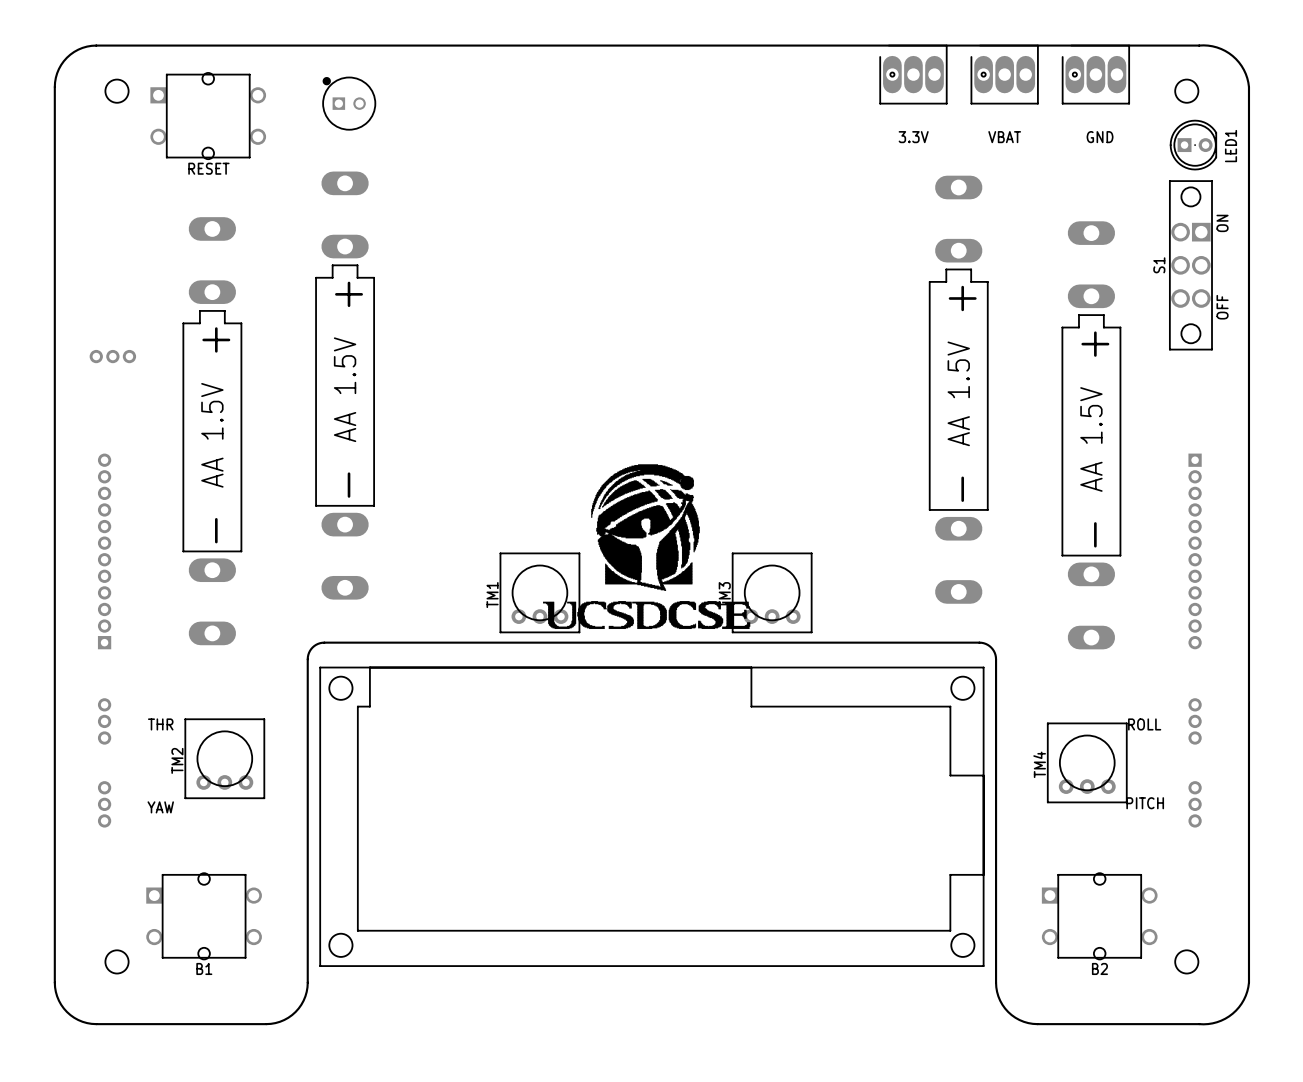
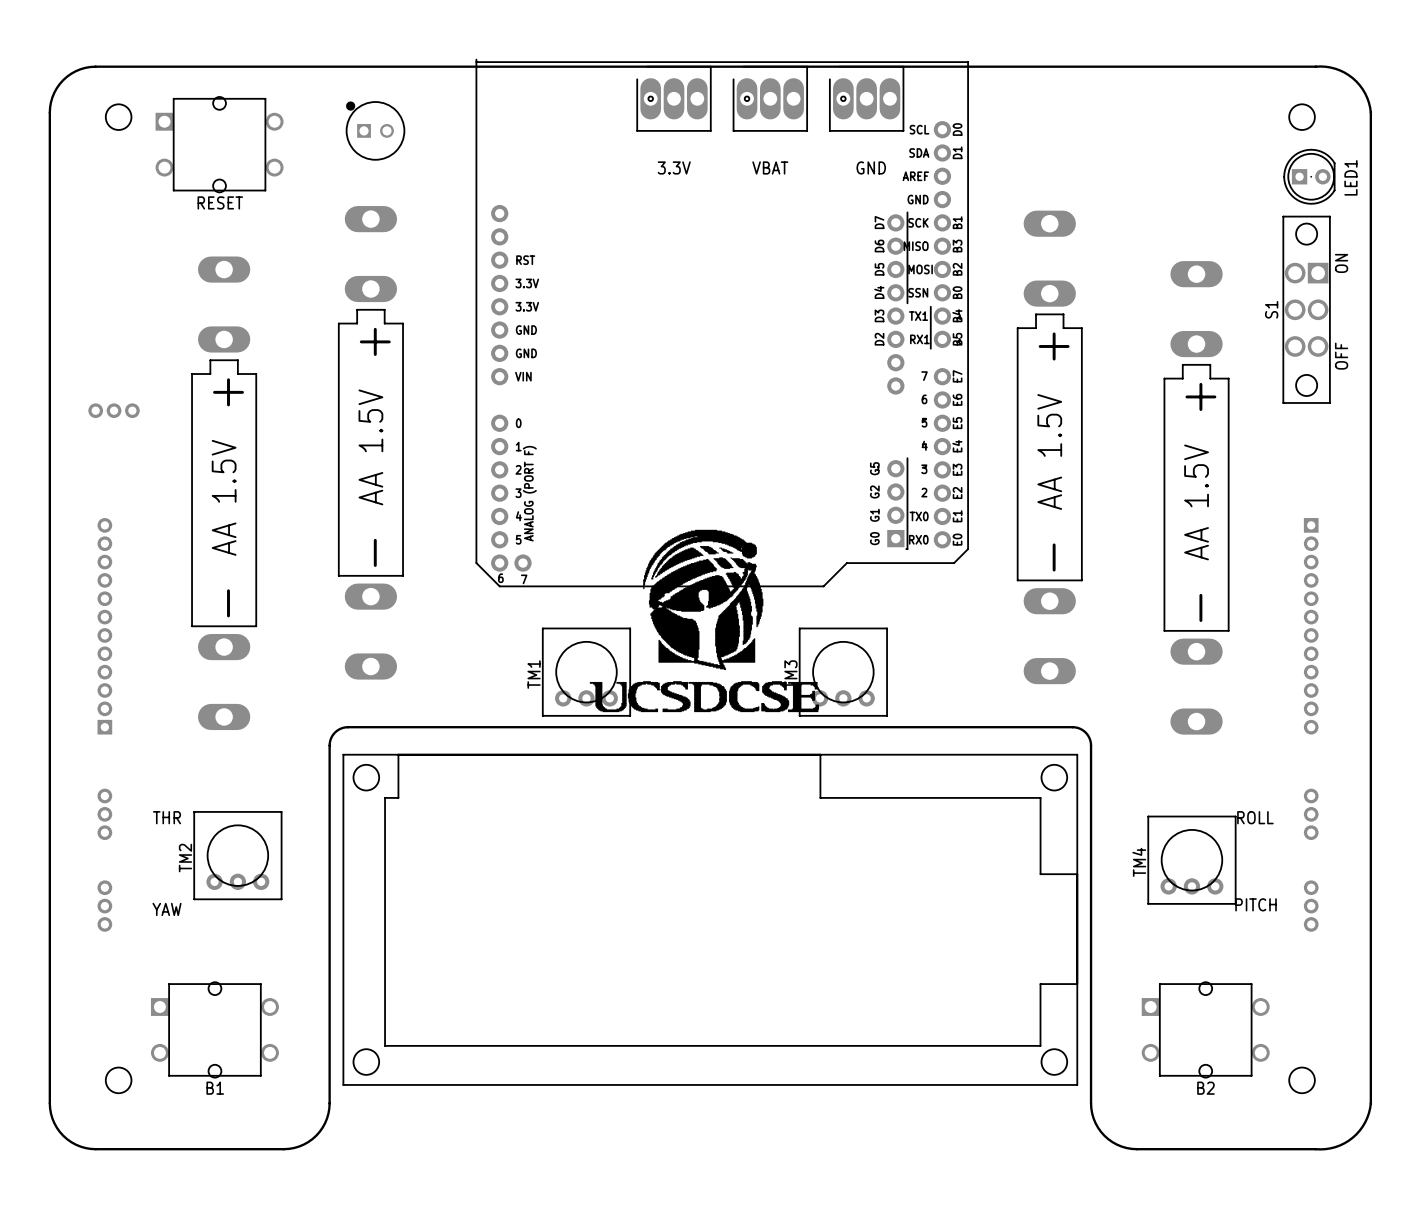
VBAT: none -> (770, 98)
GND: none -> (866, 98)
3.3V position: (913, 74) -> (674, 98)
VBAT: (1004, 74) -> none
GND: (1095, 74) -> none
part: none -> (722, 323)

